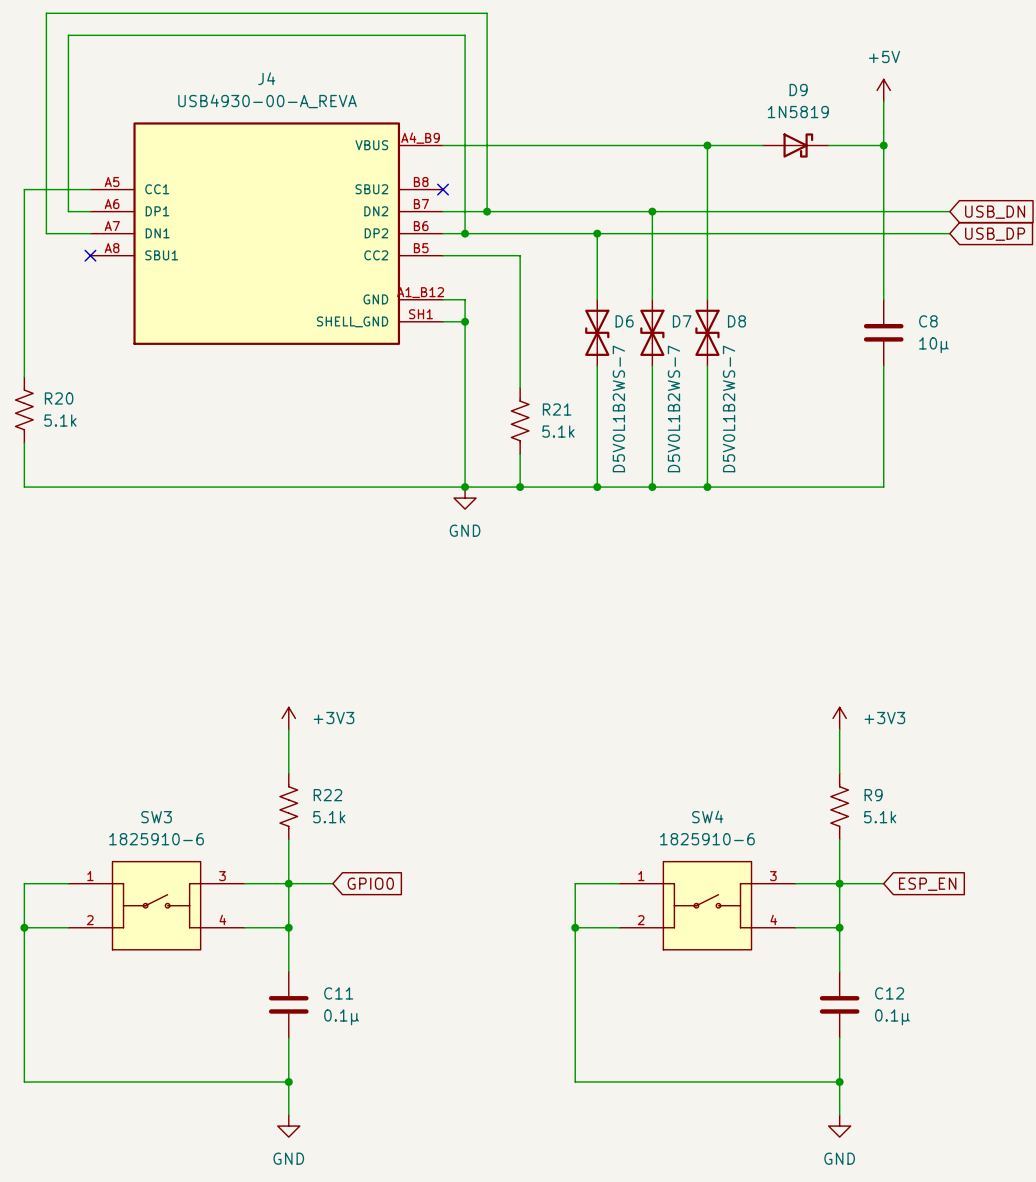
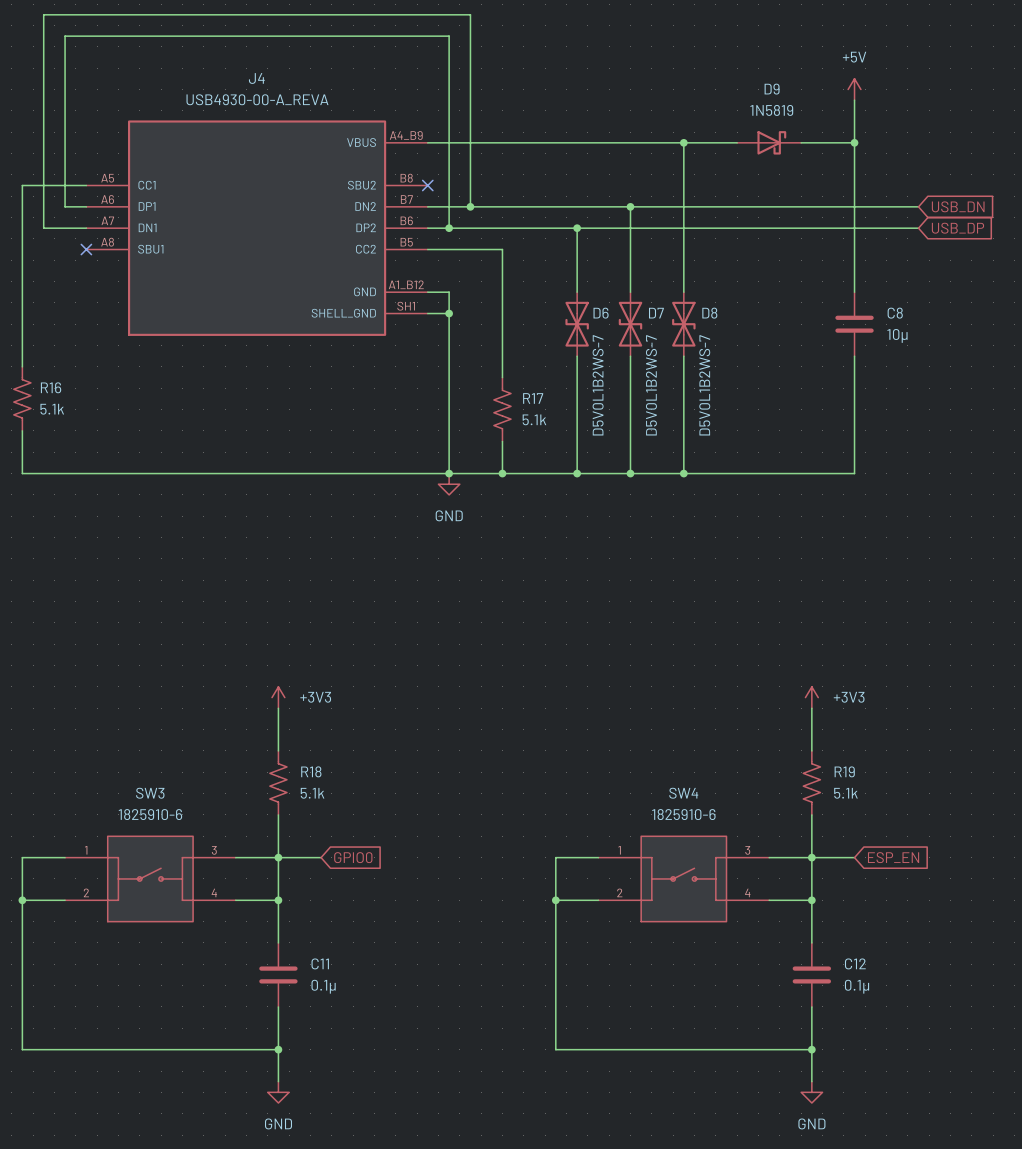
R20 name: R20 (59, 398) -> R16 (51, 387)
R21 name: R21 (557, 409) -> R17 (533, 398)
R22 name: R22 (327, 795) -> R18 (311, 771)
R9 name: R9 (873, 795) -> R19 (844, 771)

